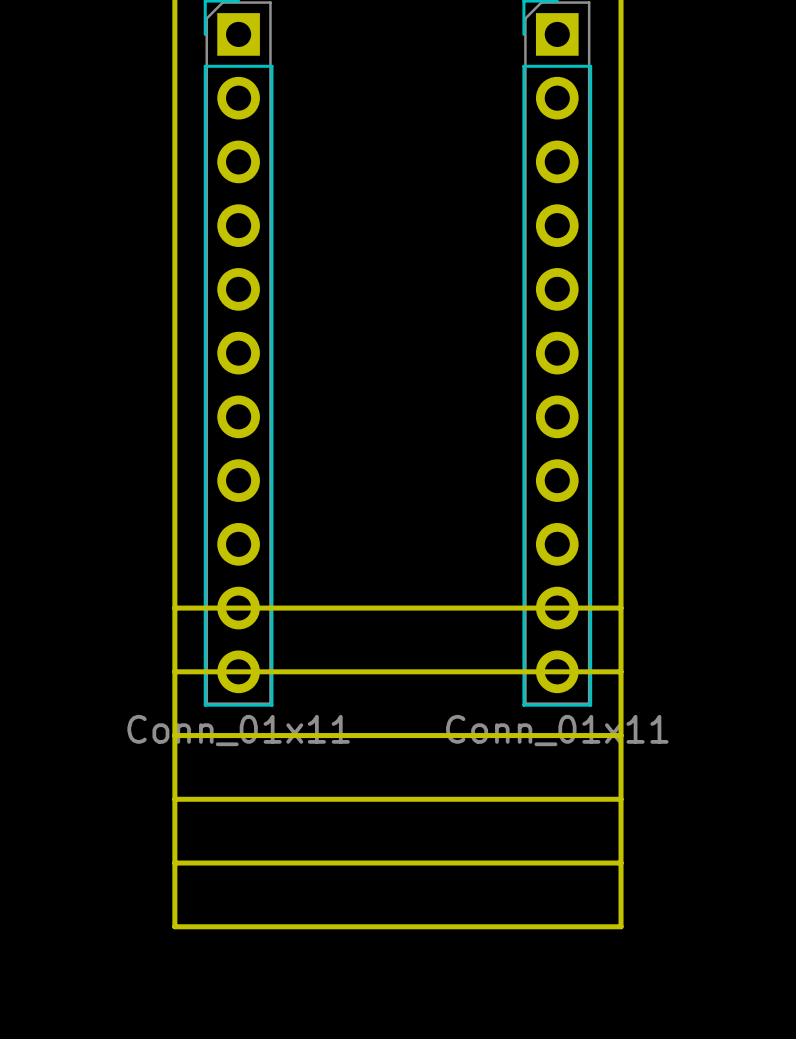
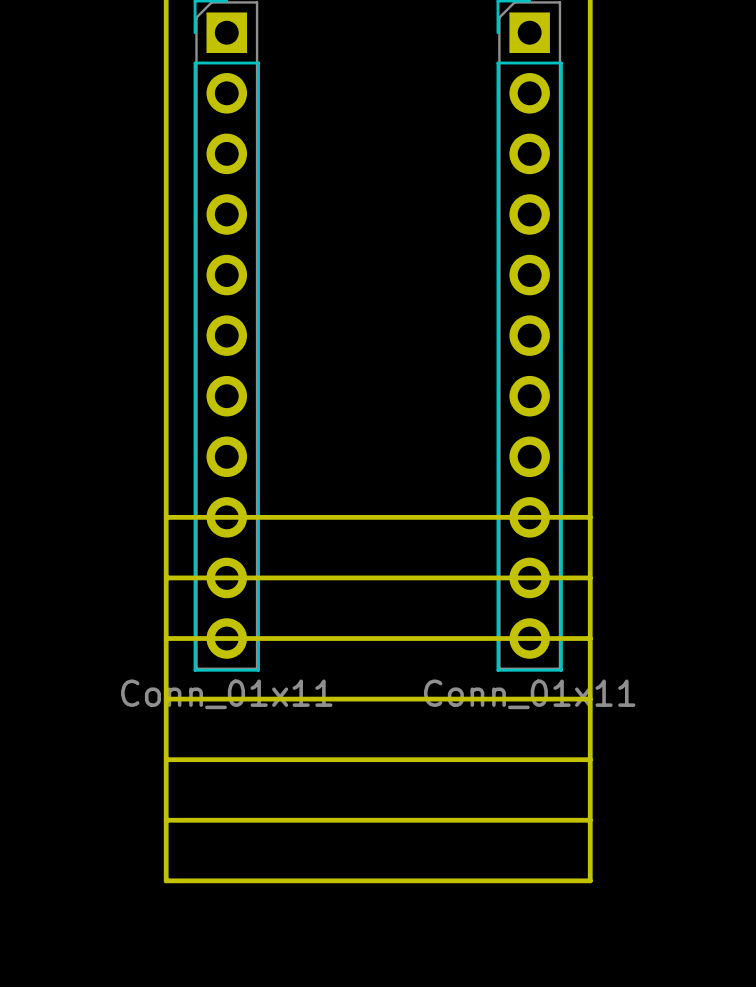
board edge: none -> (166, 517) (590, 517)

